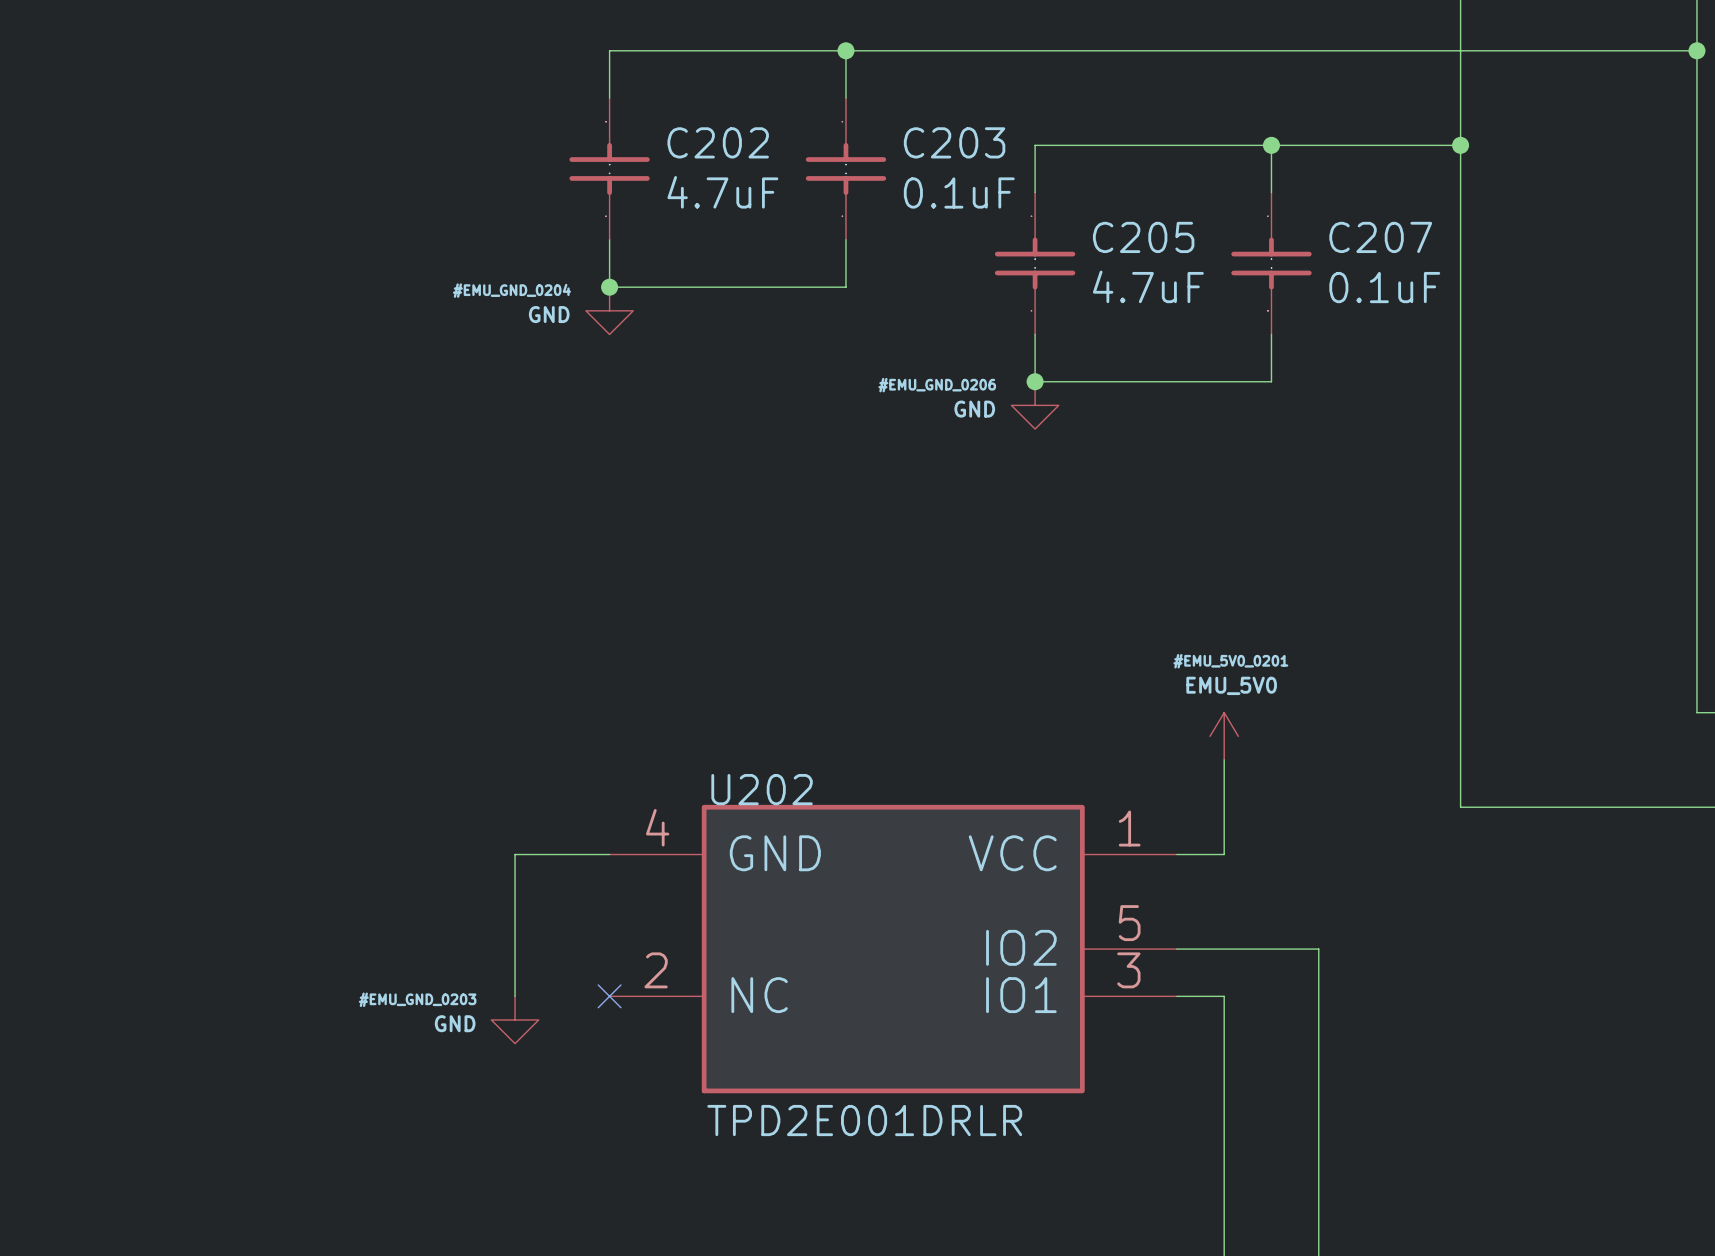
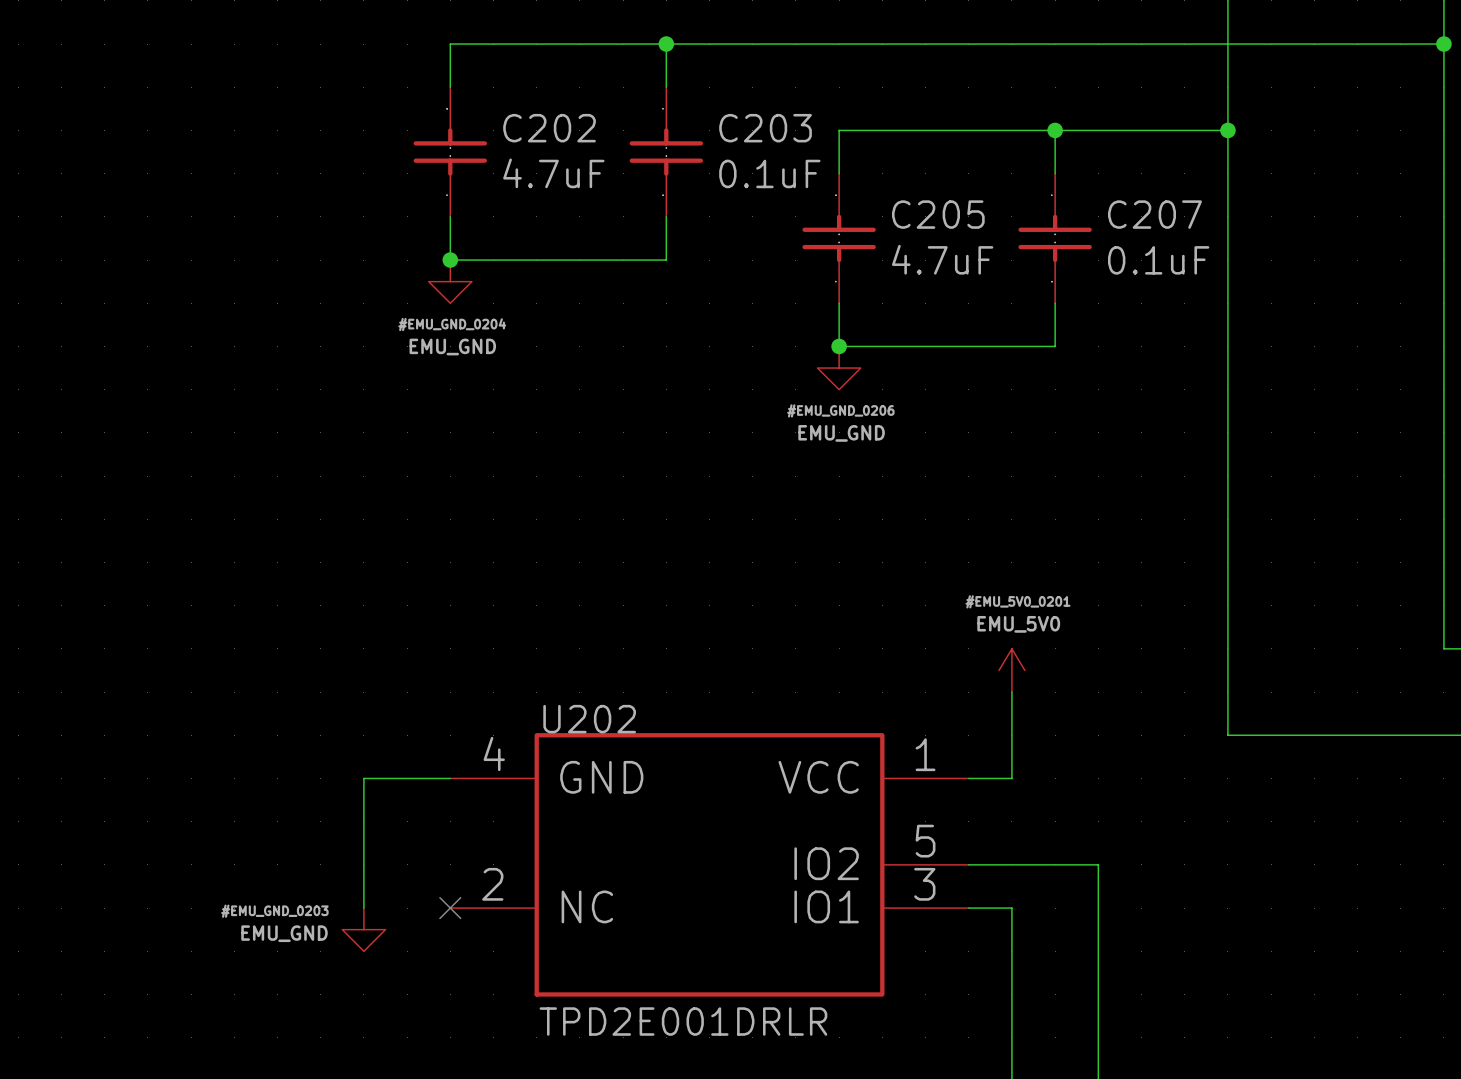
power symbol: GND (609, 310) -> EMU_GND (450, 281)
power symbol: GND (1035, 405) -> EMU_GND (839, 368)
power symbol: GND (515, 1019) -> EMU_GND (363, 929)

